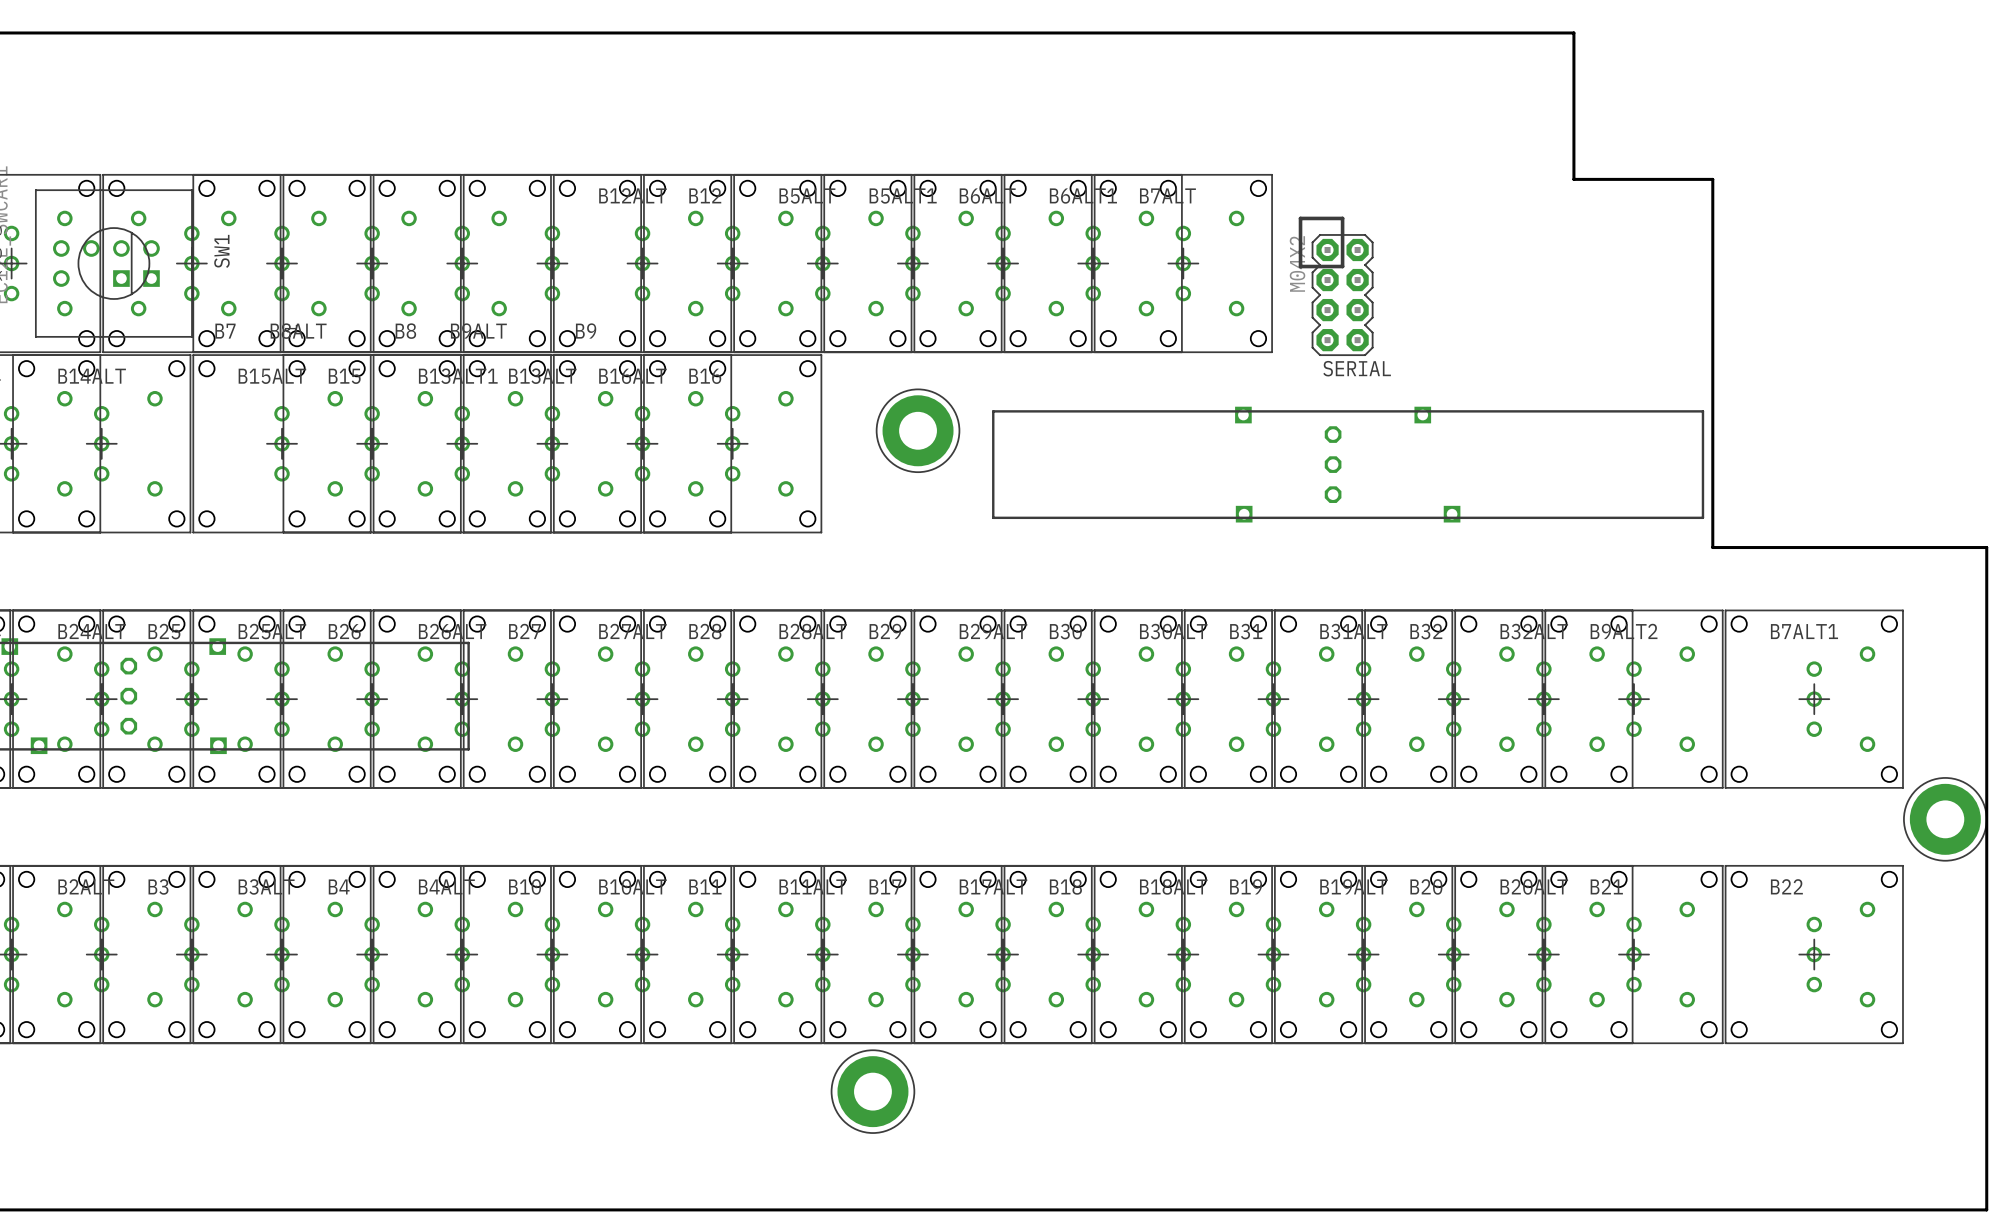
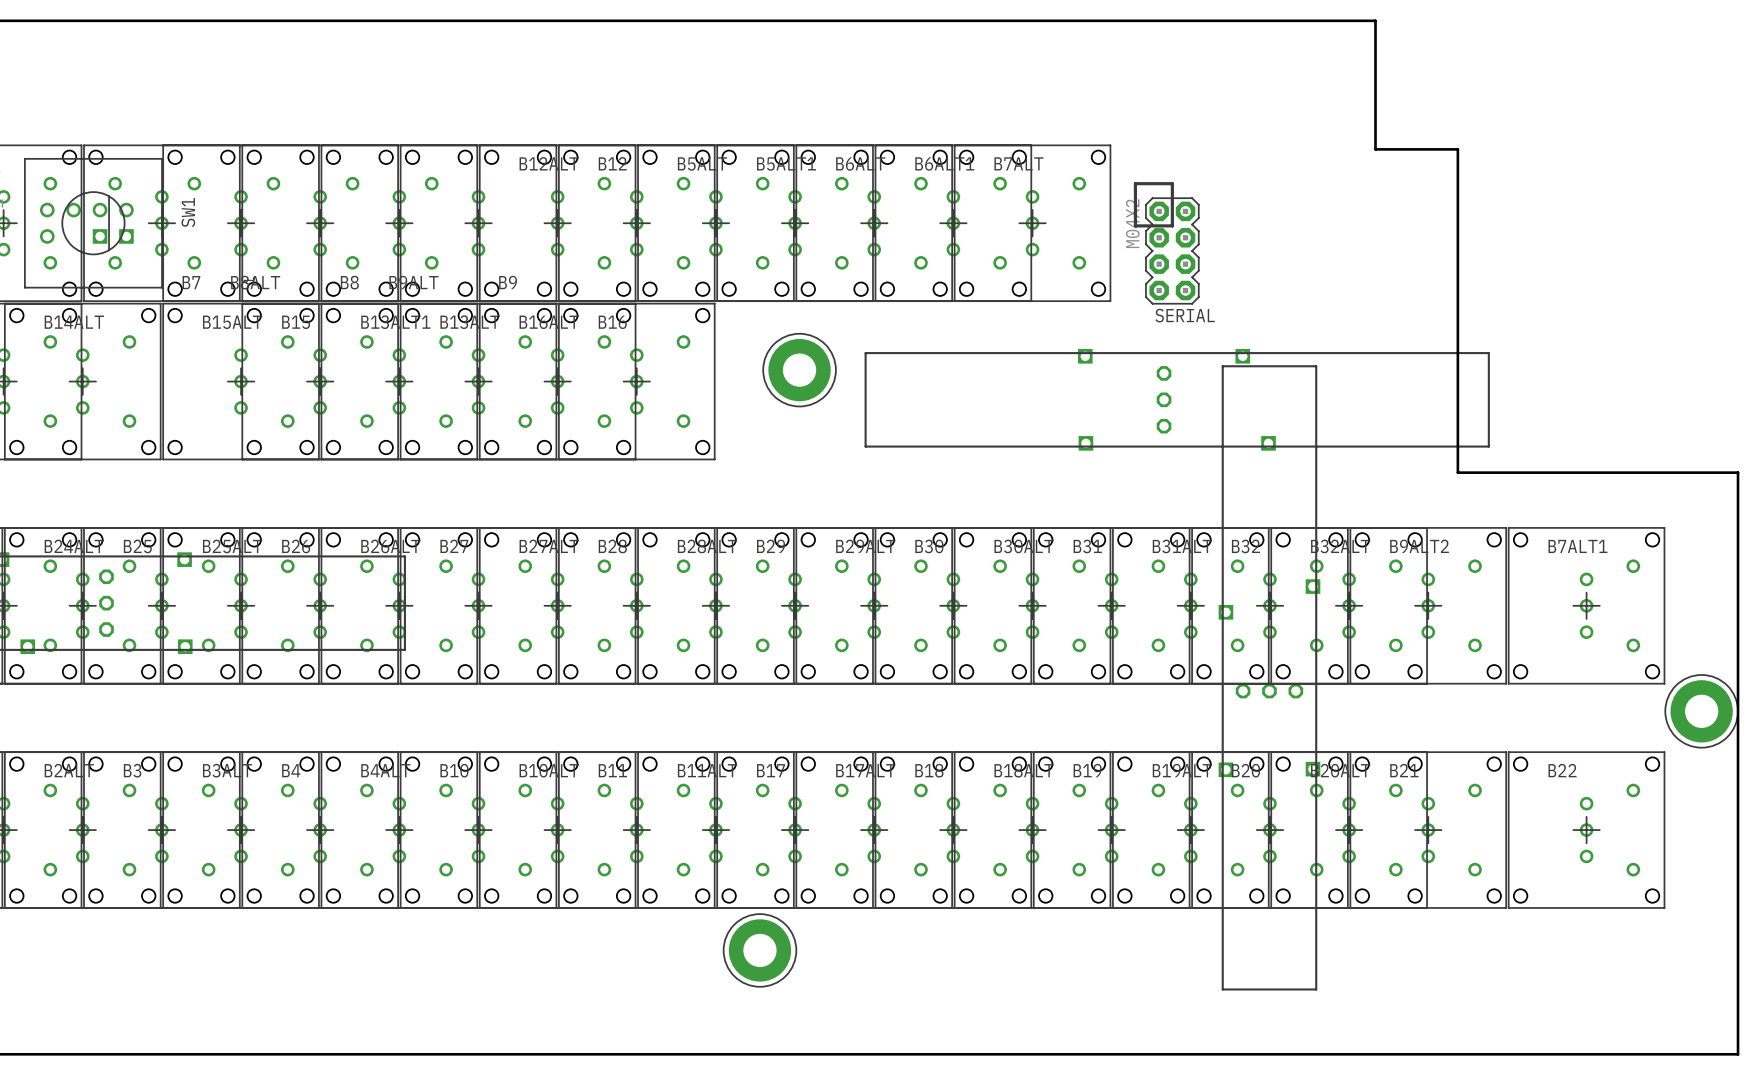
board edge: (1667, 179) (1712, 179) (1712, 547) -> (1457, 149) (1457, 472) (1497, 472)
part: none -> (1269, 677)

